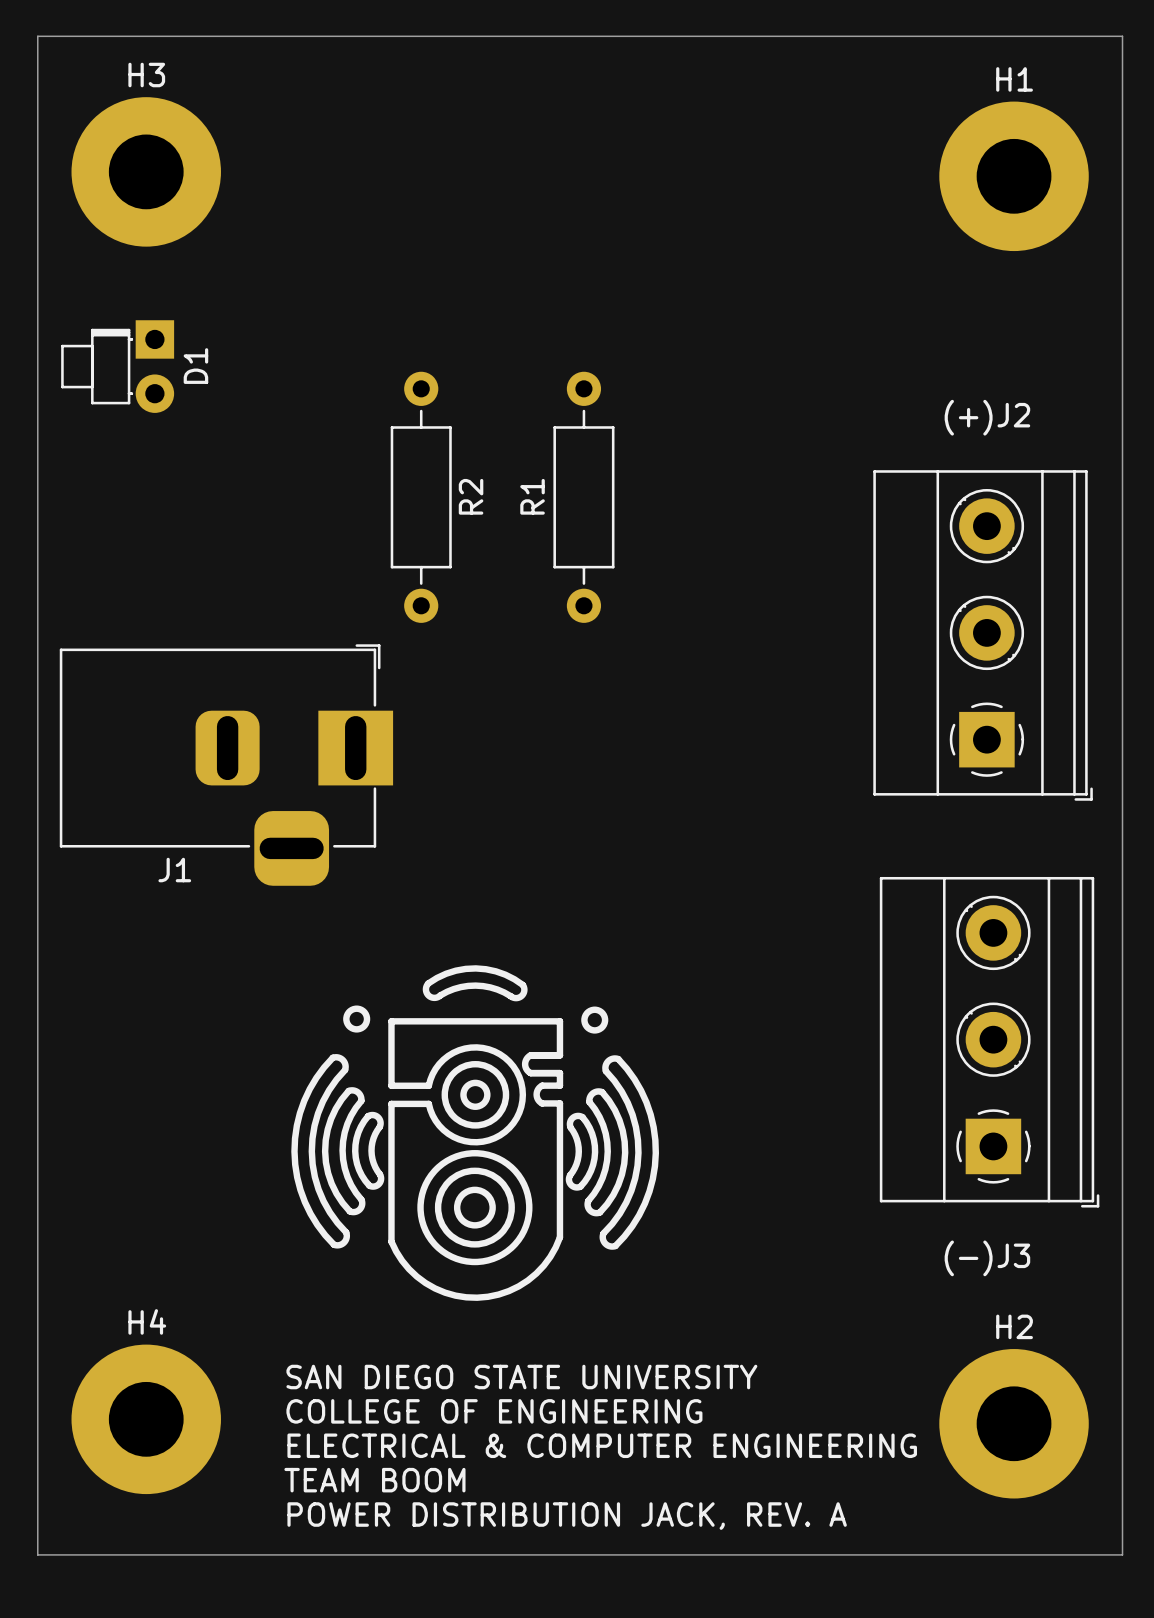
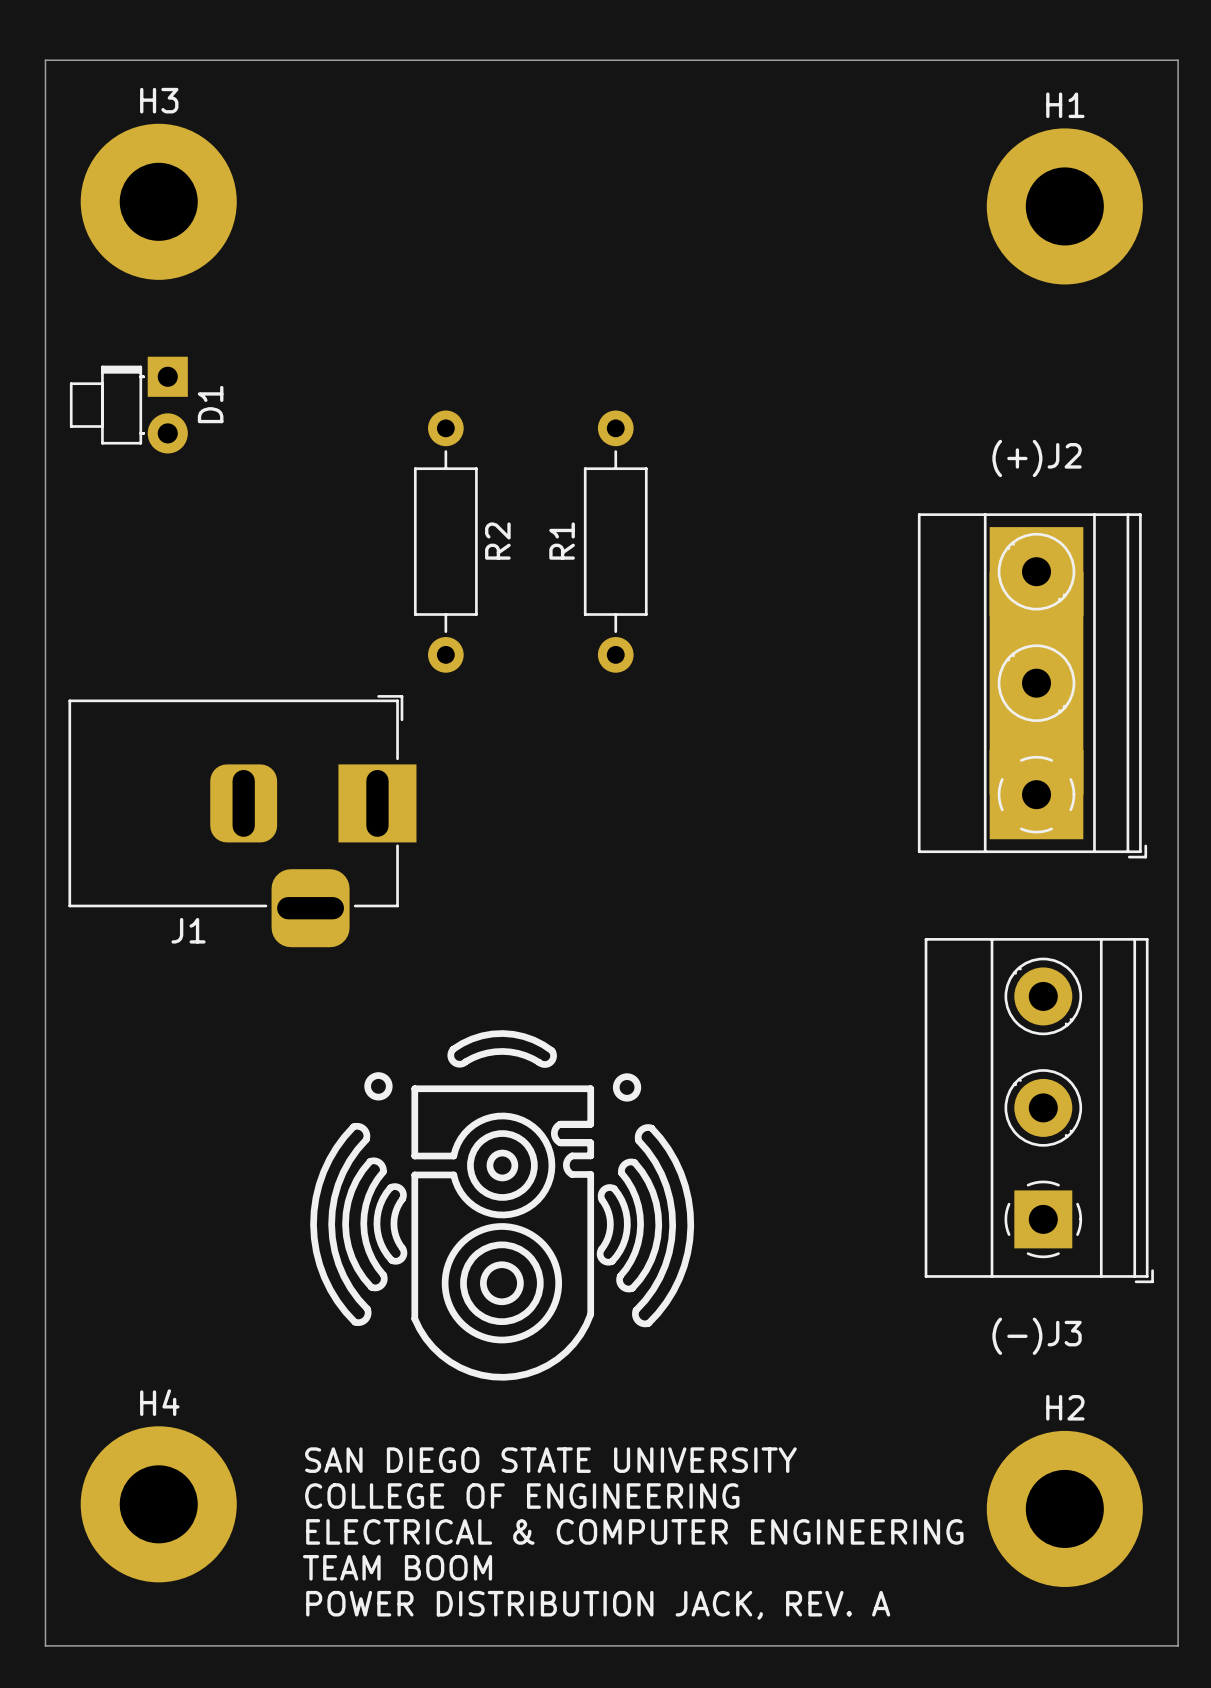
(+)J2 footprint: [873, 470, 1093, 801] -> [917, 513, 1148, 859]

